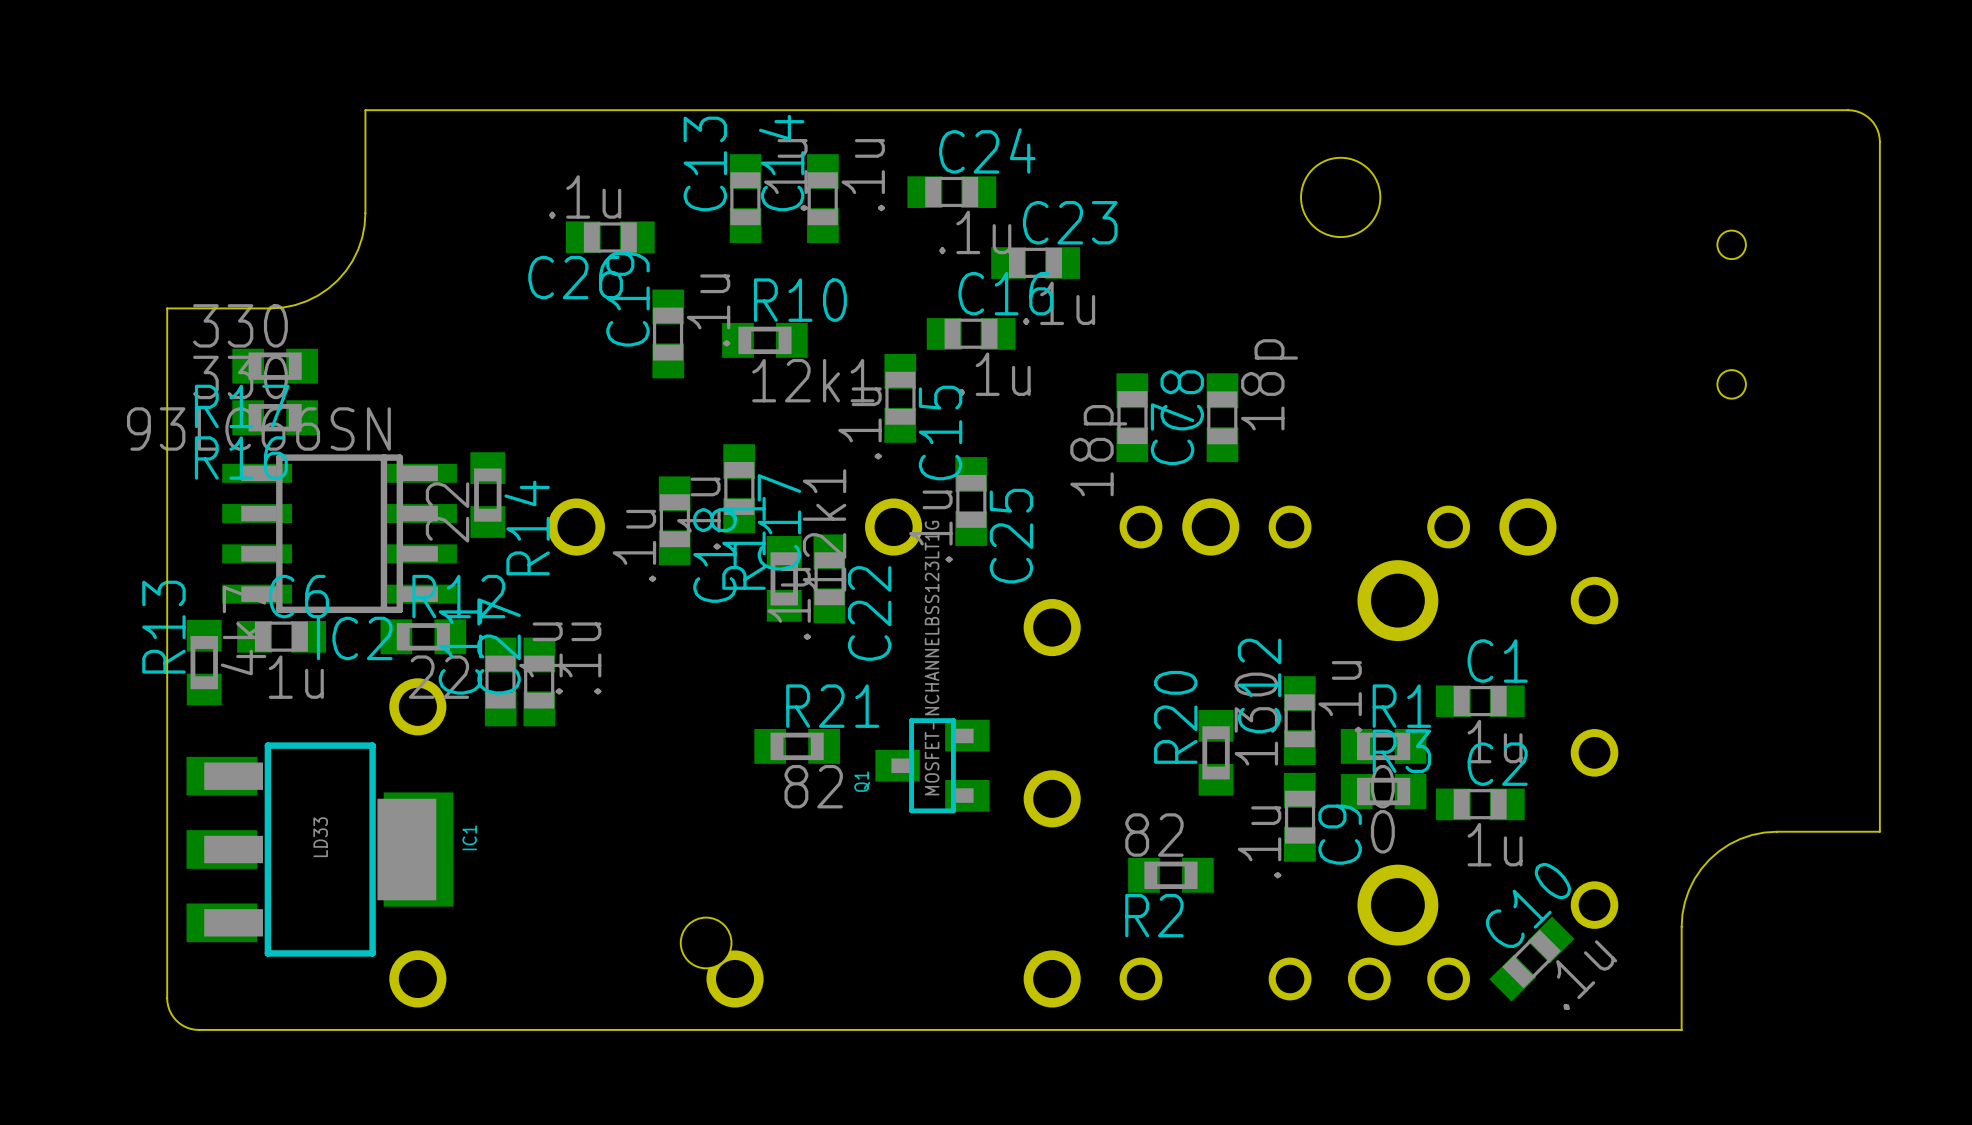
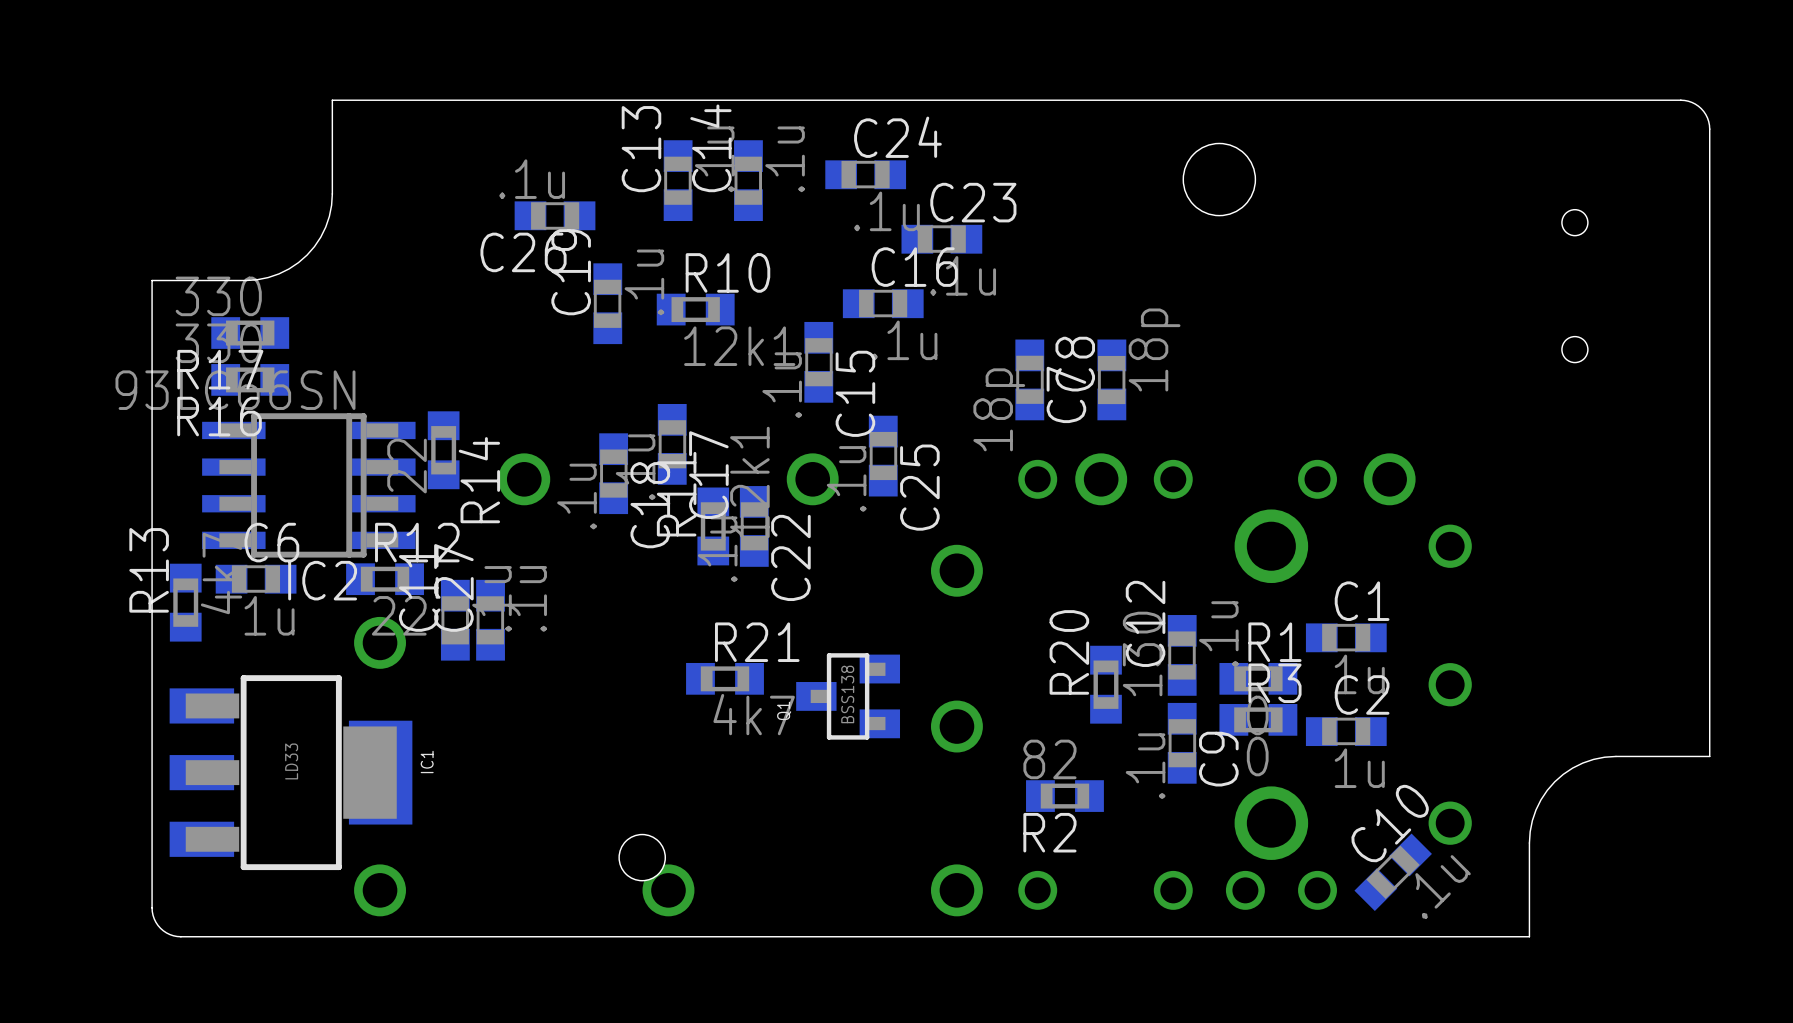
Q1 value: MOSFET-NCHANNELBSS123LT1G (932, 658) -> BSS138 (847, 694)
R21 value: 82 (813, 786) -> 4k7 (754, 714)

